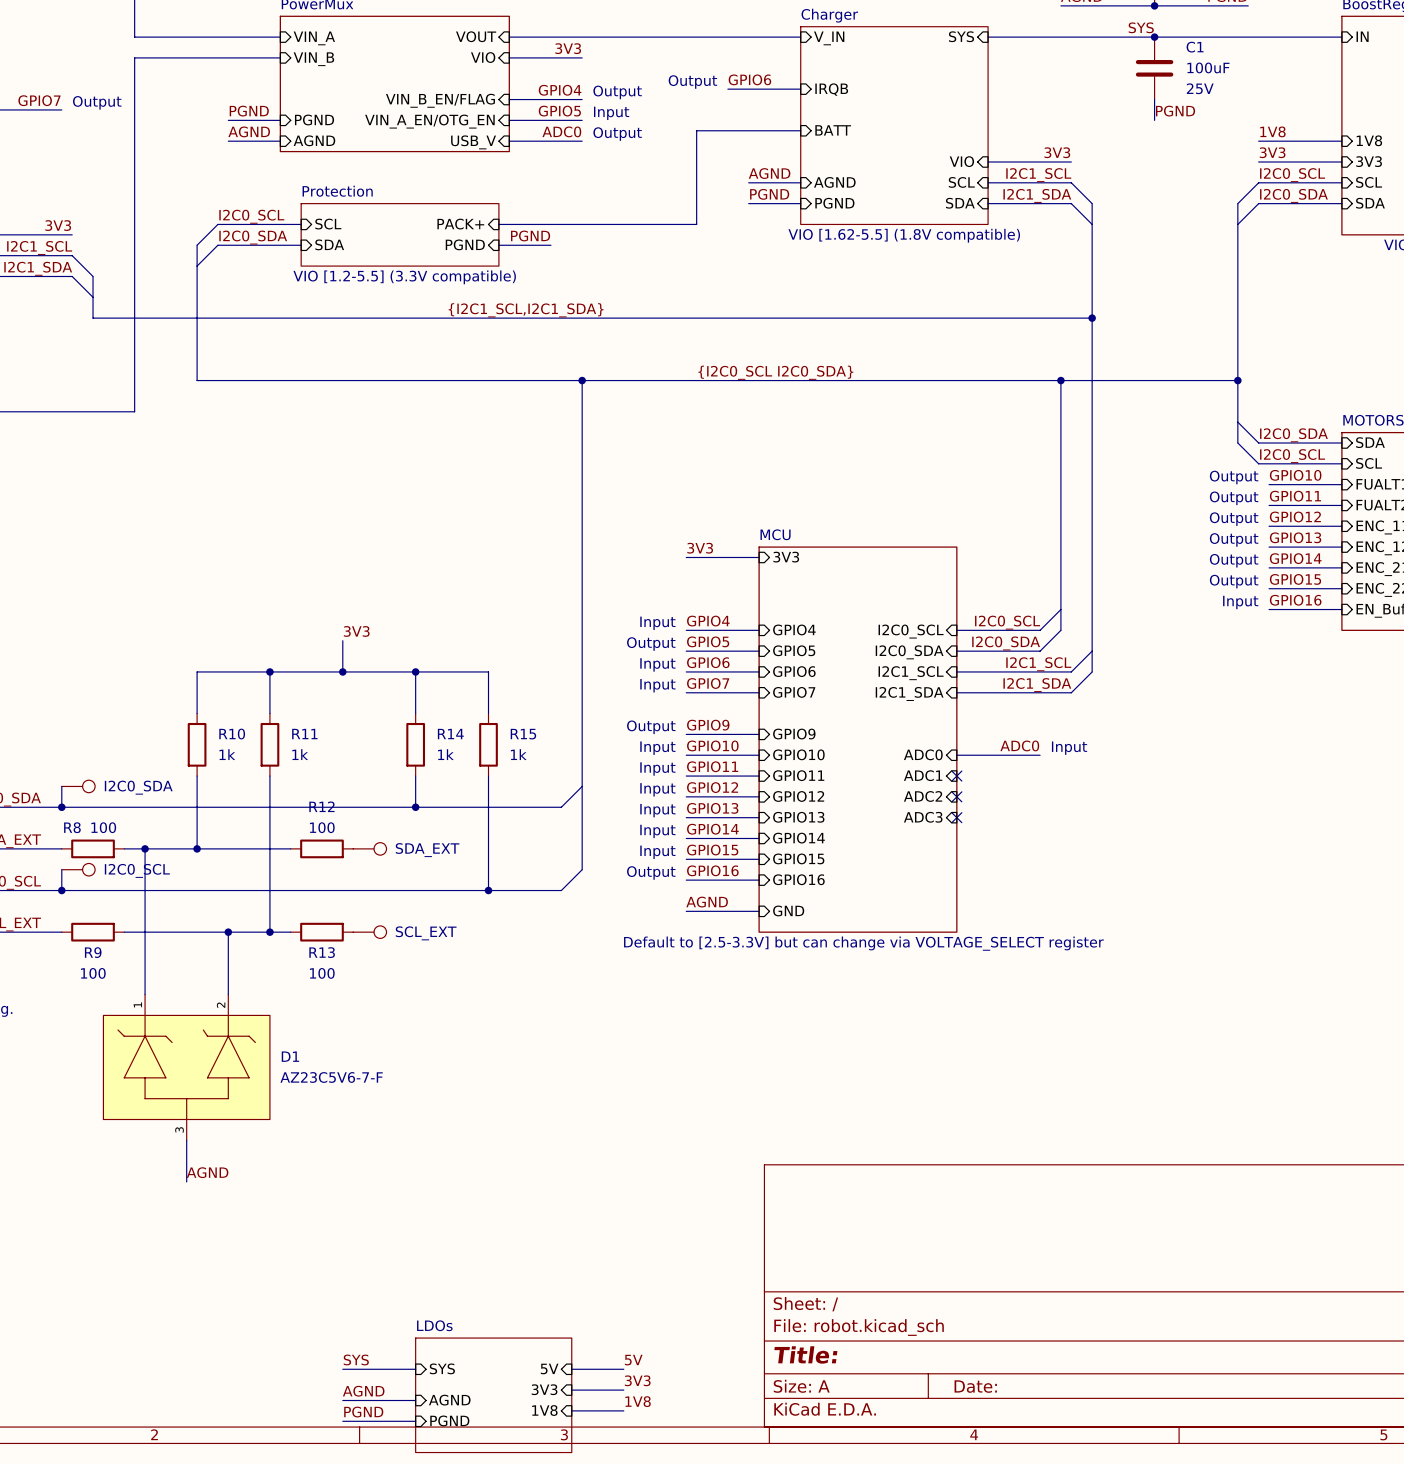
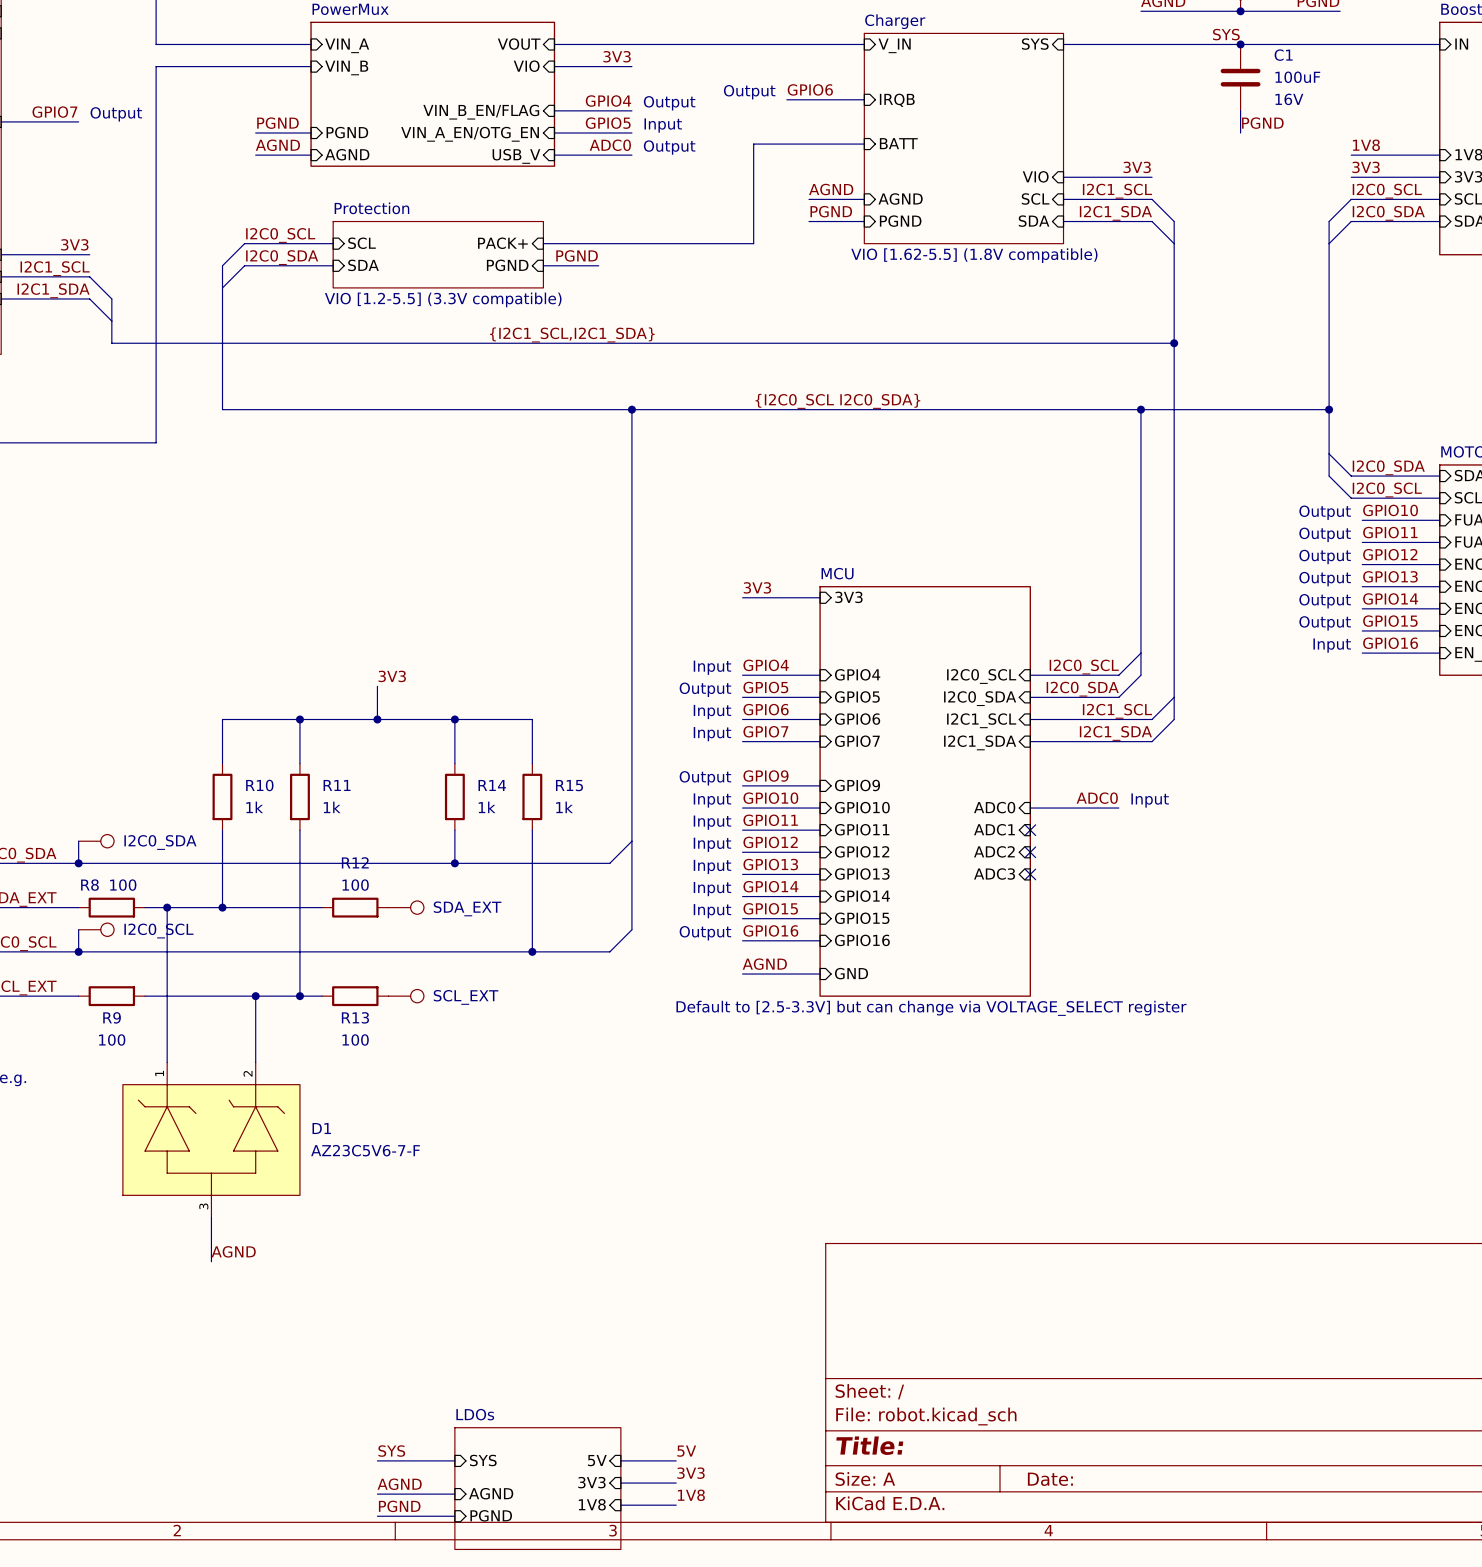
C1 text: 25V (1200, 88) -> 16V (1289, 99)

